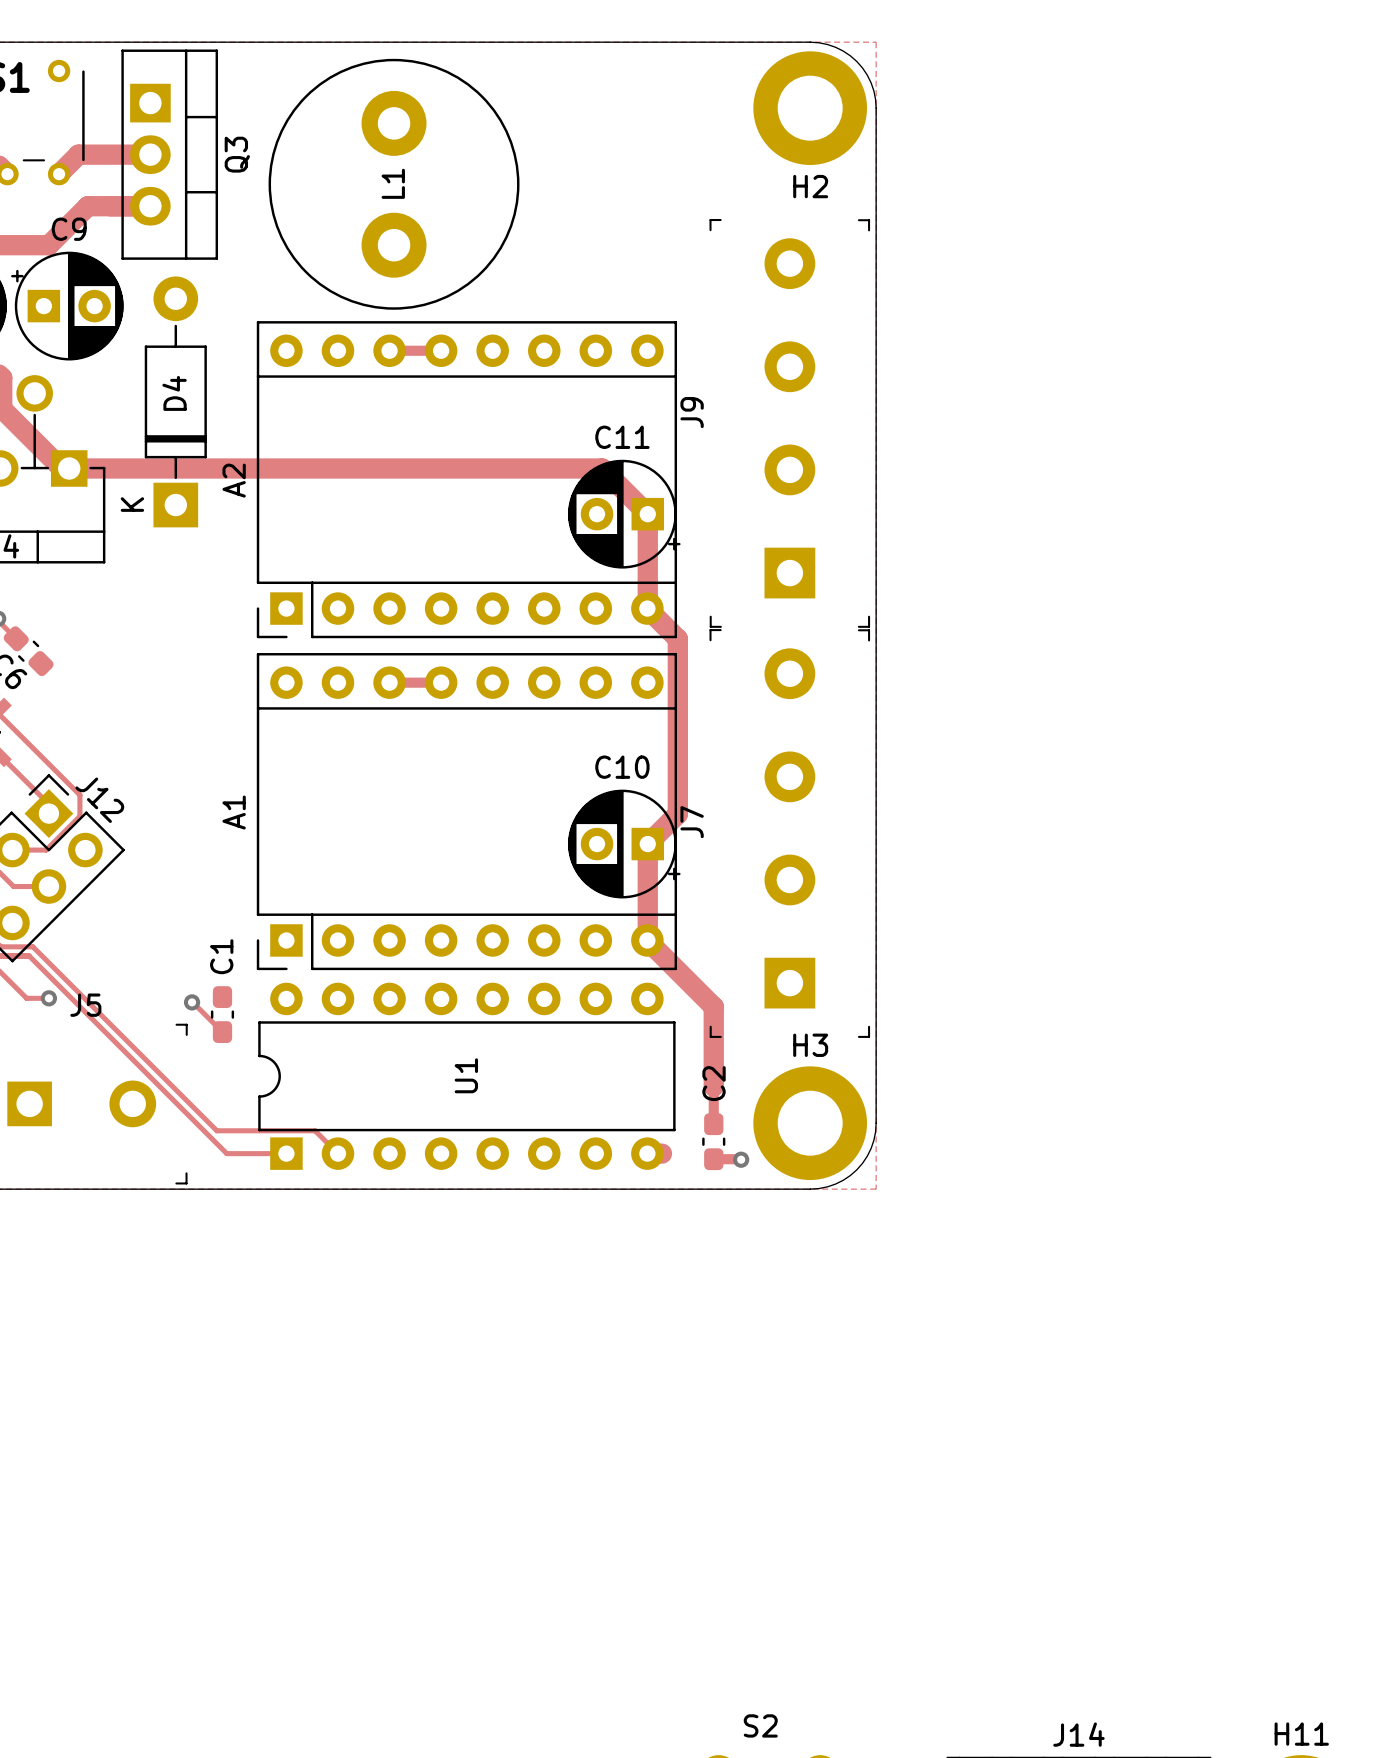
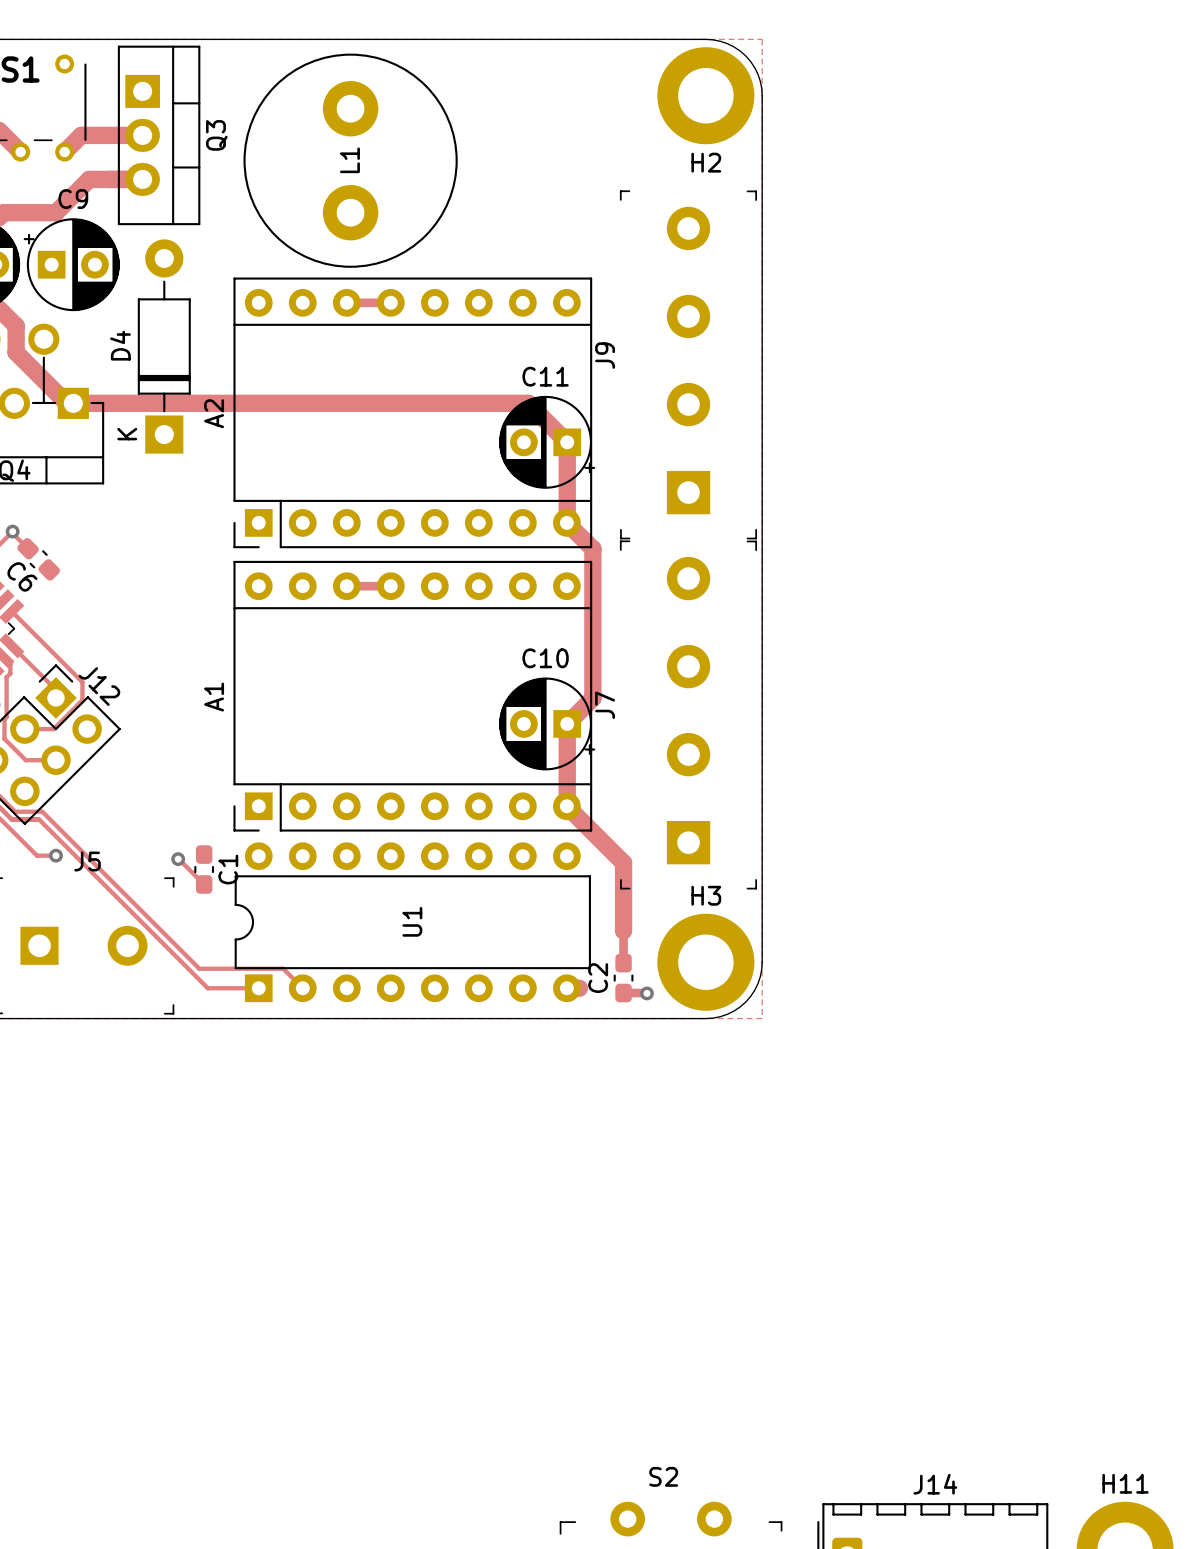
D4 name position: D4 (174, 393) -> D4 (120, 345)
C1 name position: C1 (221, 956) -> C1 (228, 869)
C2 name position: C2 (714, 1083) -> C2 (598, 978)

